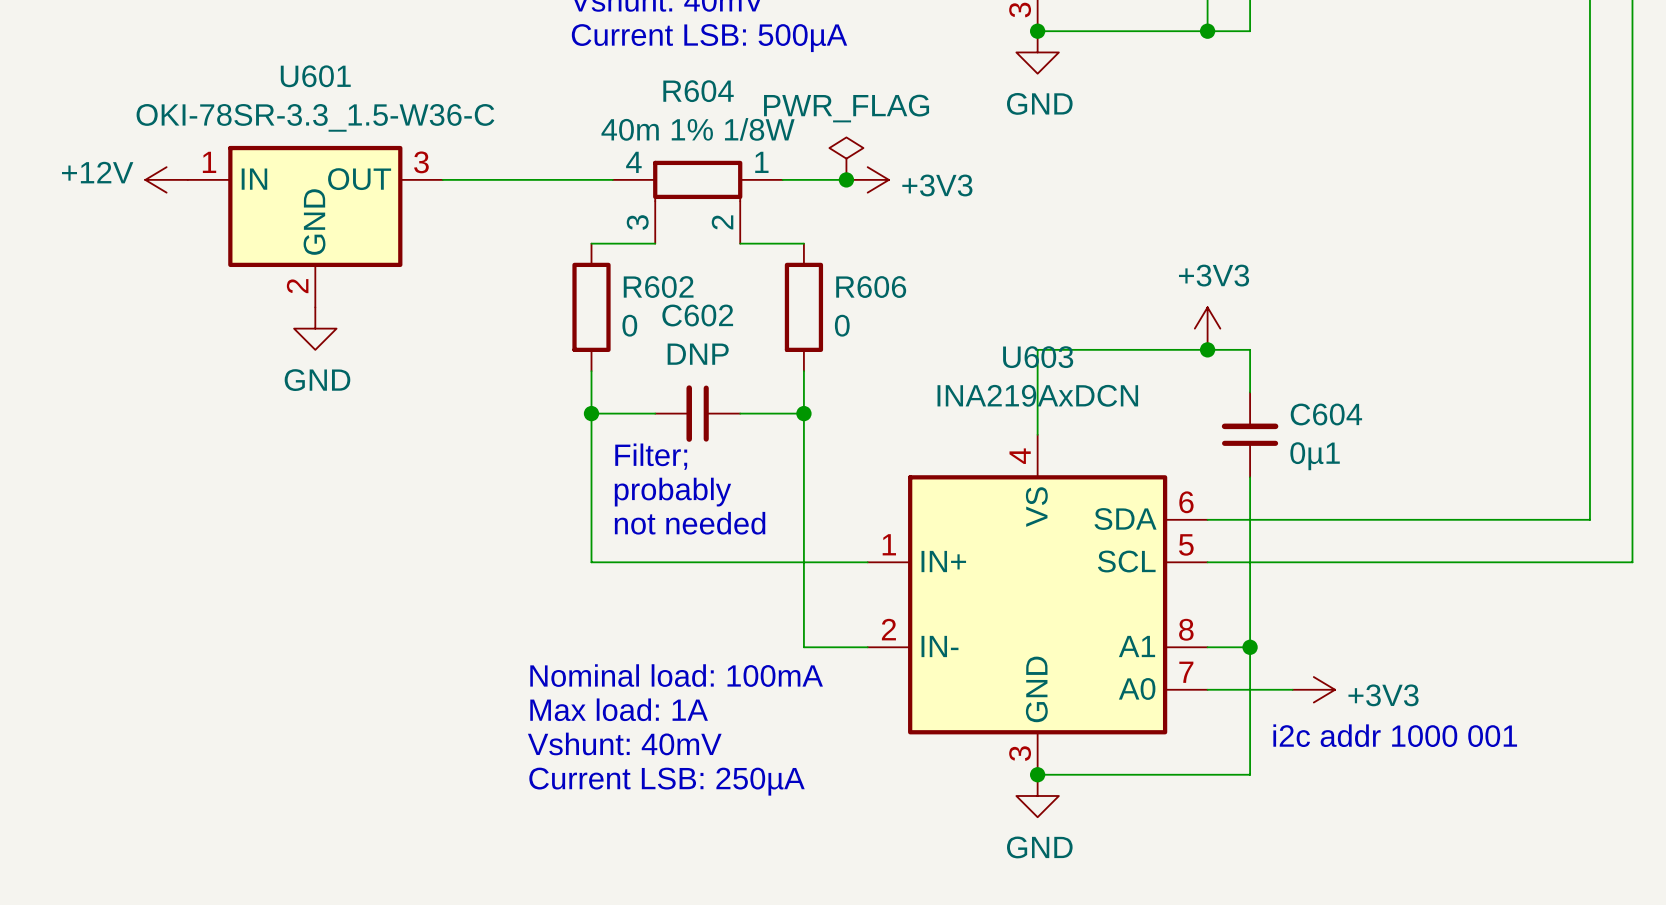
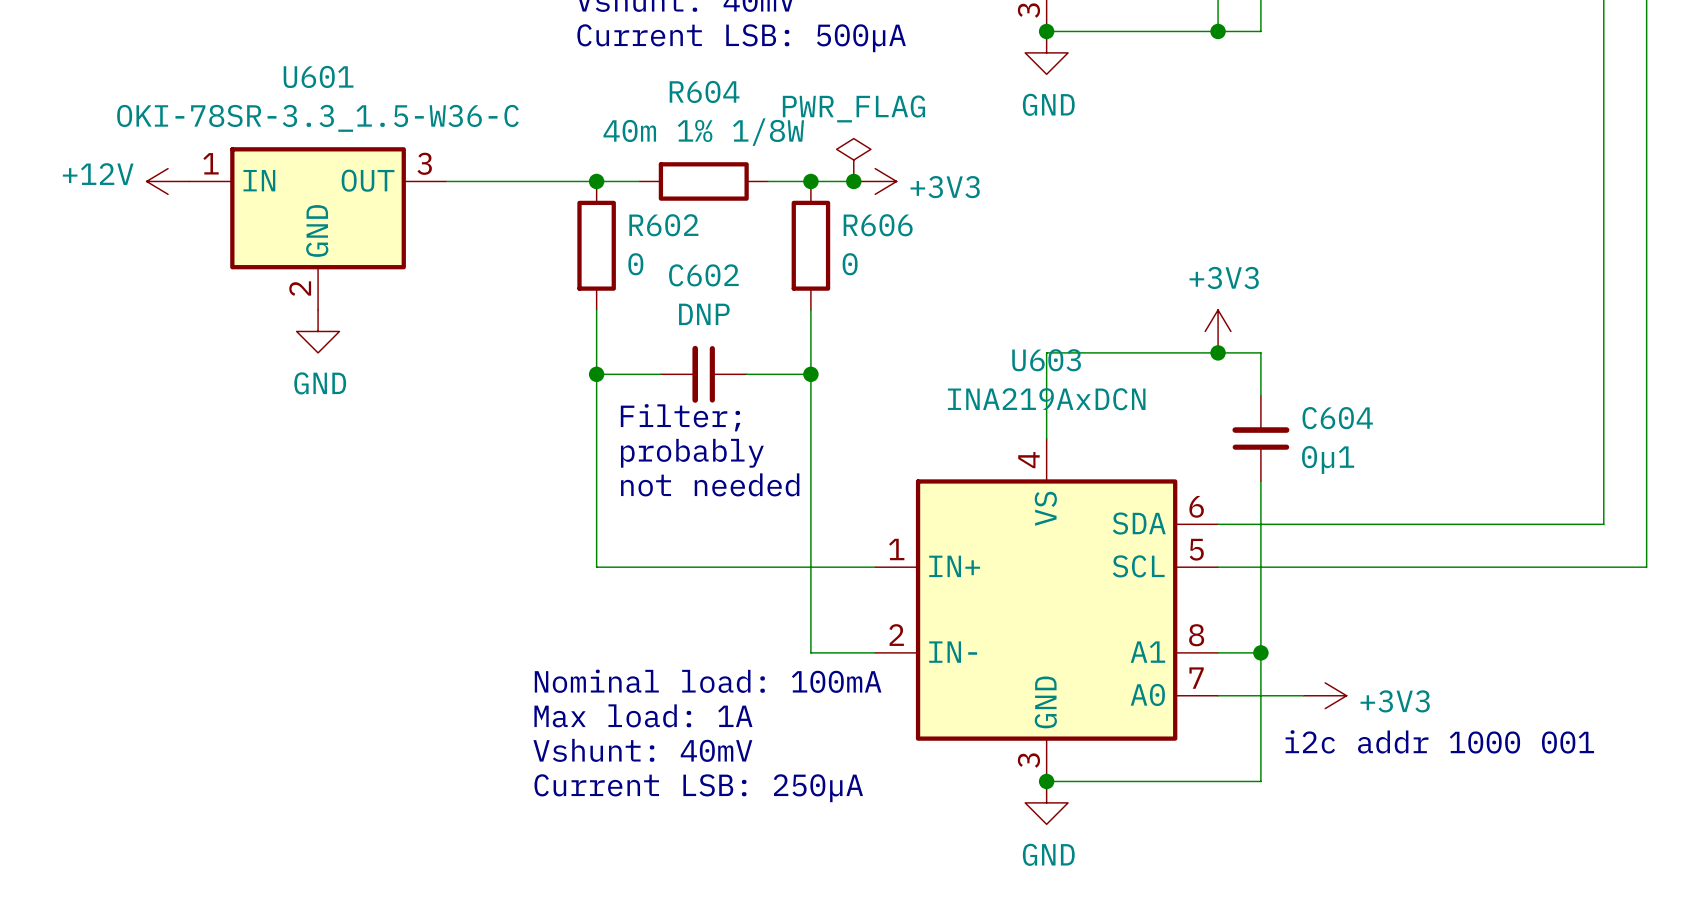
R604 symbol: [612, 160, 783, 244] -> [639, 162, 769, 201]
junction: none -> (596, 181)
junction: none -> (810, 181)
wire: (591, 243) (655, 243) -> none
wire: (740, 243) (803, 243) -> none
wire: none -> (596, 310) (596, 374) (660, 374)
R602 position: (591, 307) -> (596, 245)
wire: none -> (810, 310) (810, 374) (746, 374)
R606 position: (803, 307) -> (810, 245)
wire: (591, 413) (655, 413) -> none
junction position: (591, 413) -> (596, 374)
C602 position: (697, 413) -> (703, 374)
wire: (740, 413) (803, 413) -> none
junction position: (803, 413) -> (810, 374)
text position: Filter; (651, 456) -> Filter; (680, 417)
text position: probably (672, 492) -> probably (692, 453)
text position: not needed (690, 523) -> not needed (710, 484)

